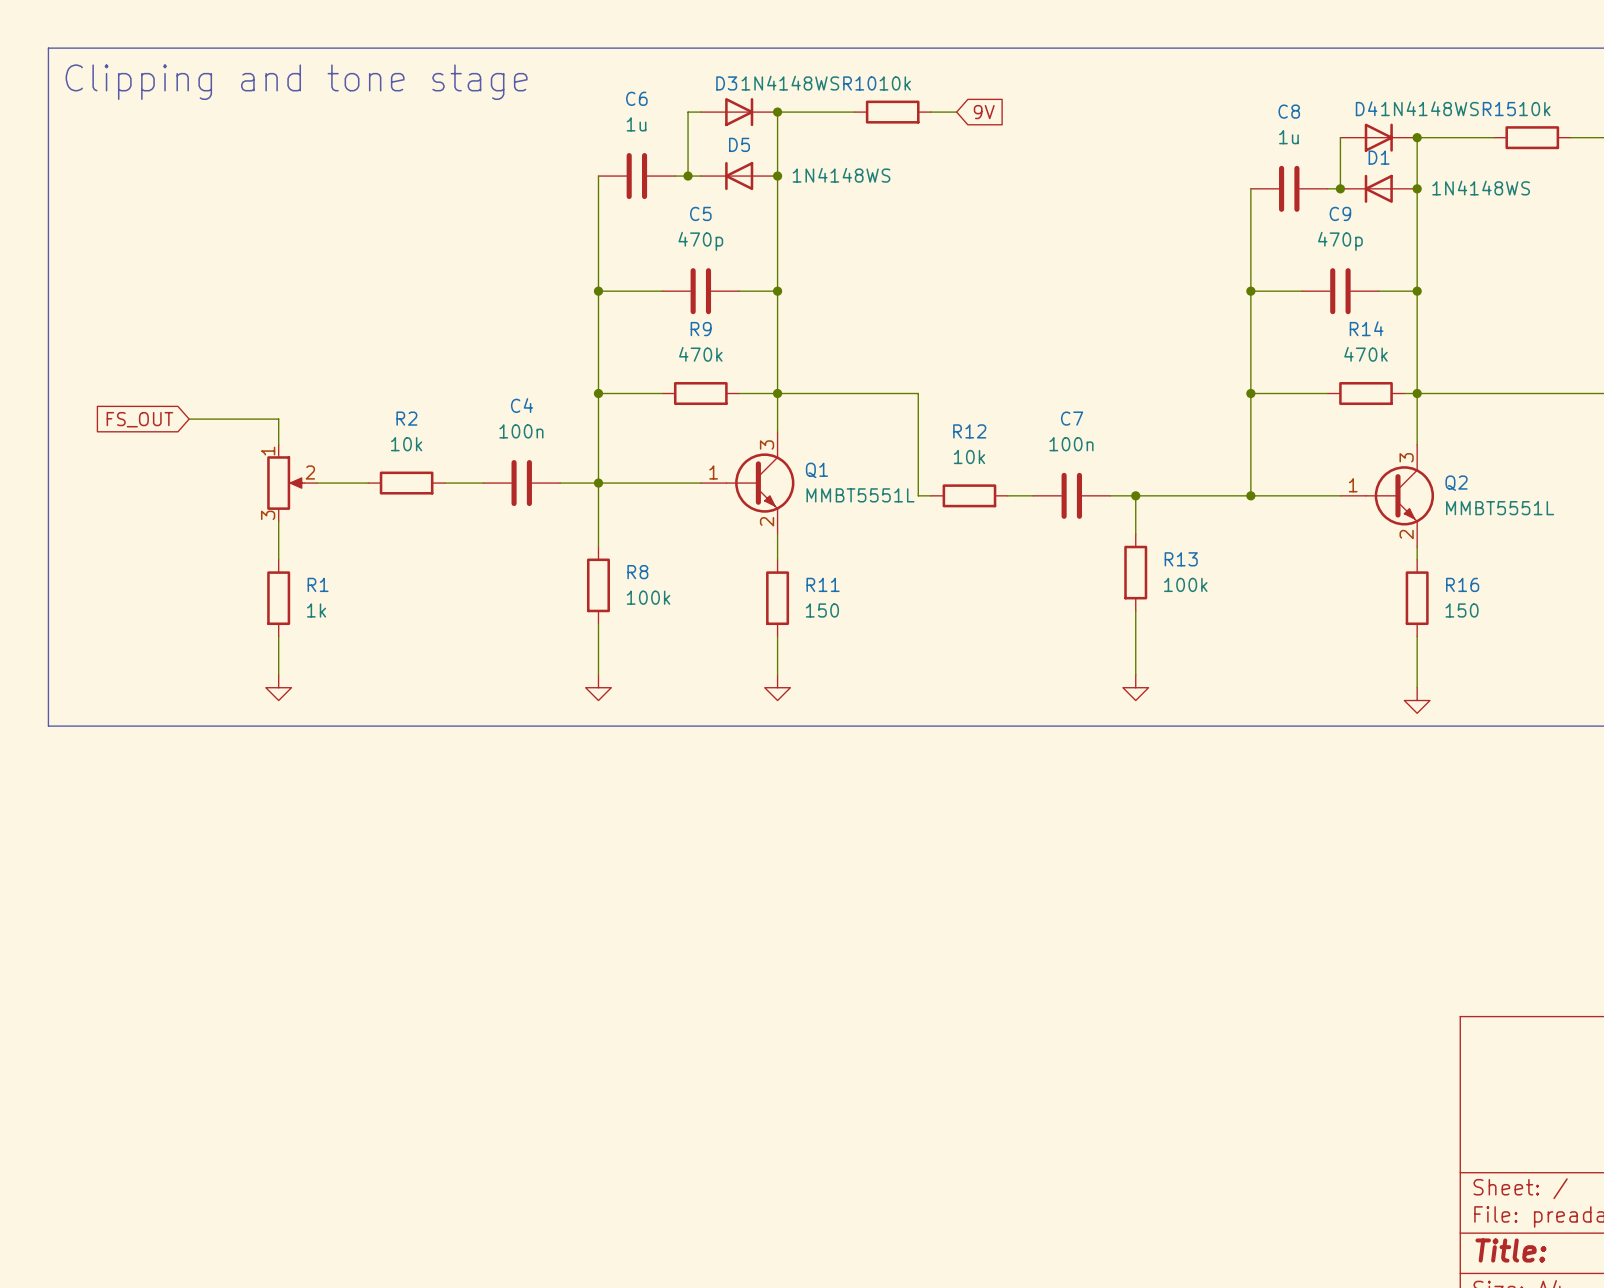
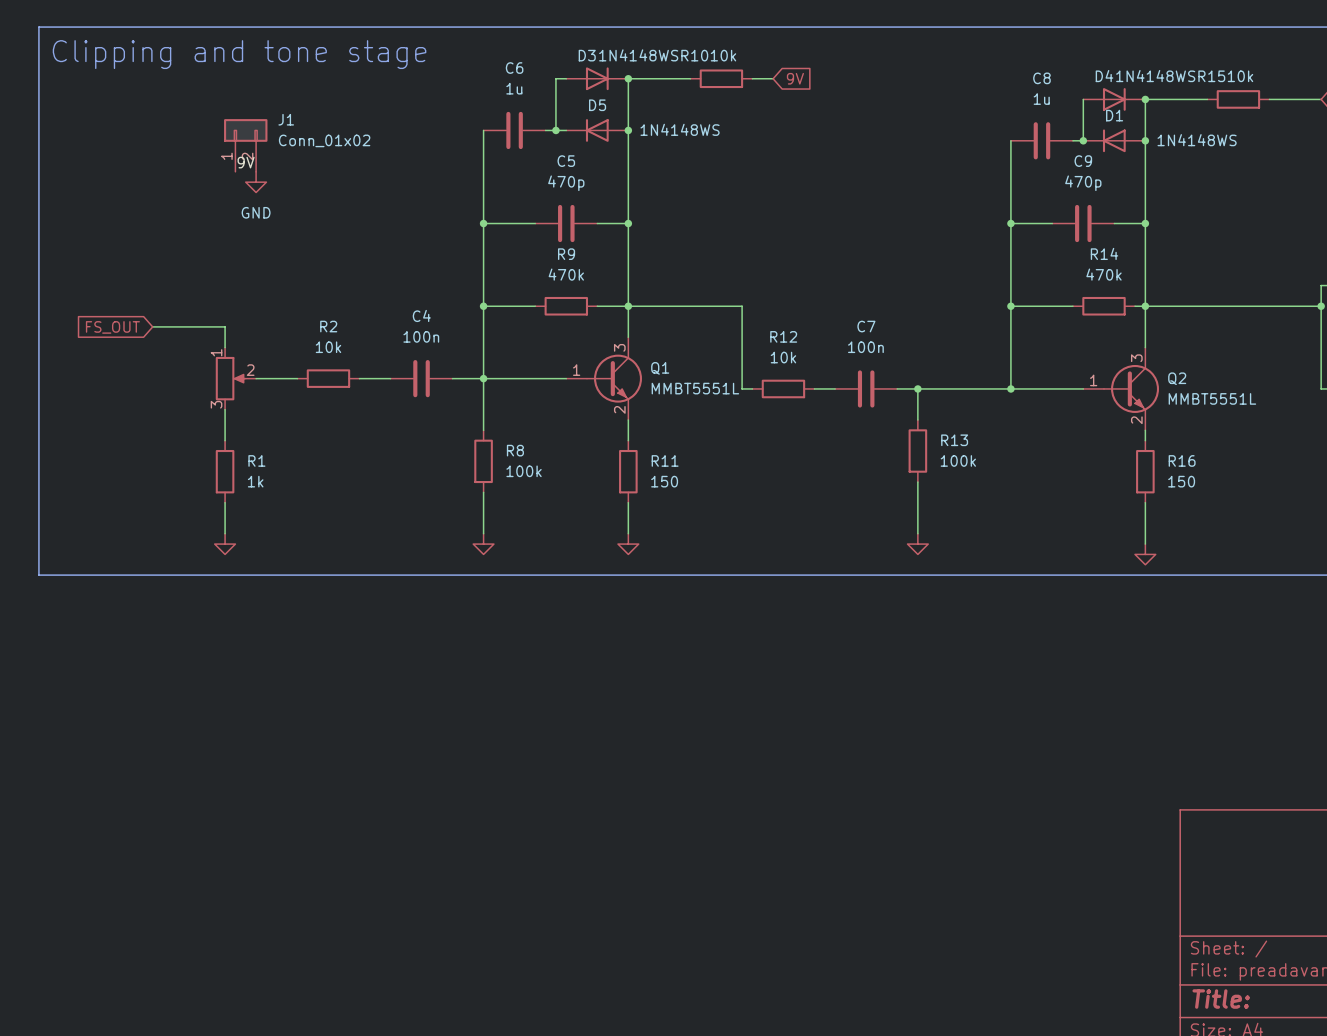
J1: none -> Conn_01x02 (245, 145)
label: none -> 9V (246, 162)
power symbol: none -> GND (256, 182)

